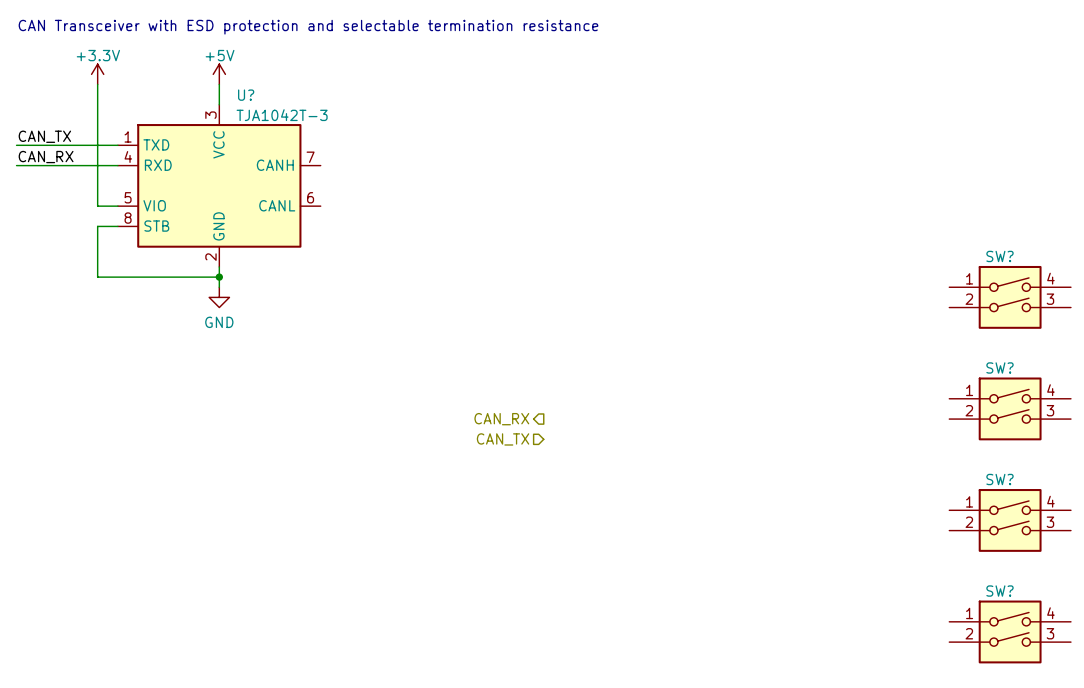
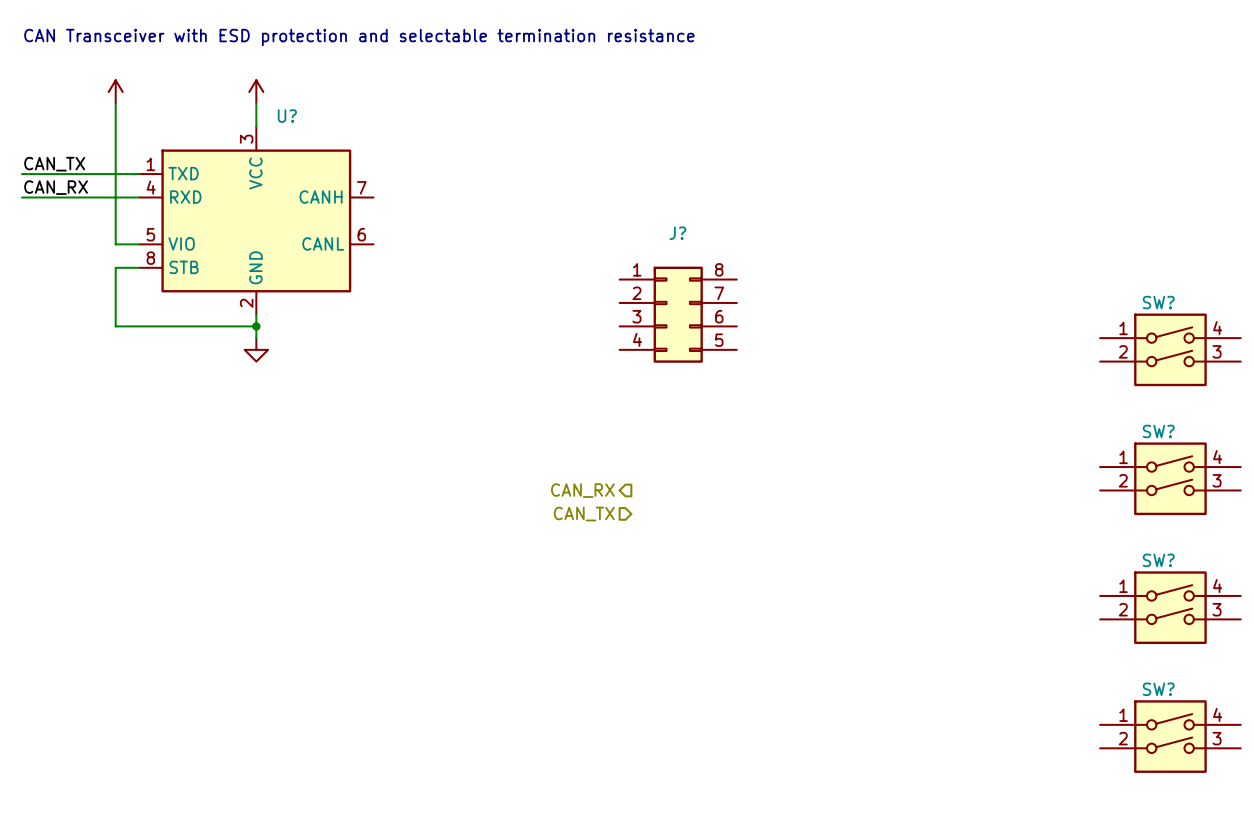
power symbol text: +3.3V (98, 55) -> none
power symbol text: +5V (220, 55) -> none
U? value: TJA1042T-3 (282, 115) -> none
J?: none -> (678, 314)
power symbol text: GND (219, 322) -> none

